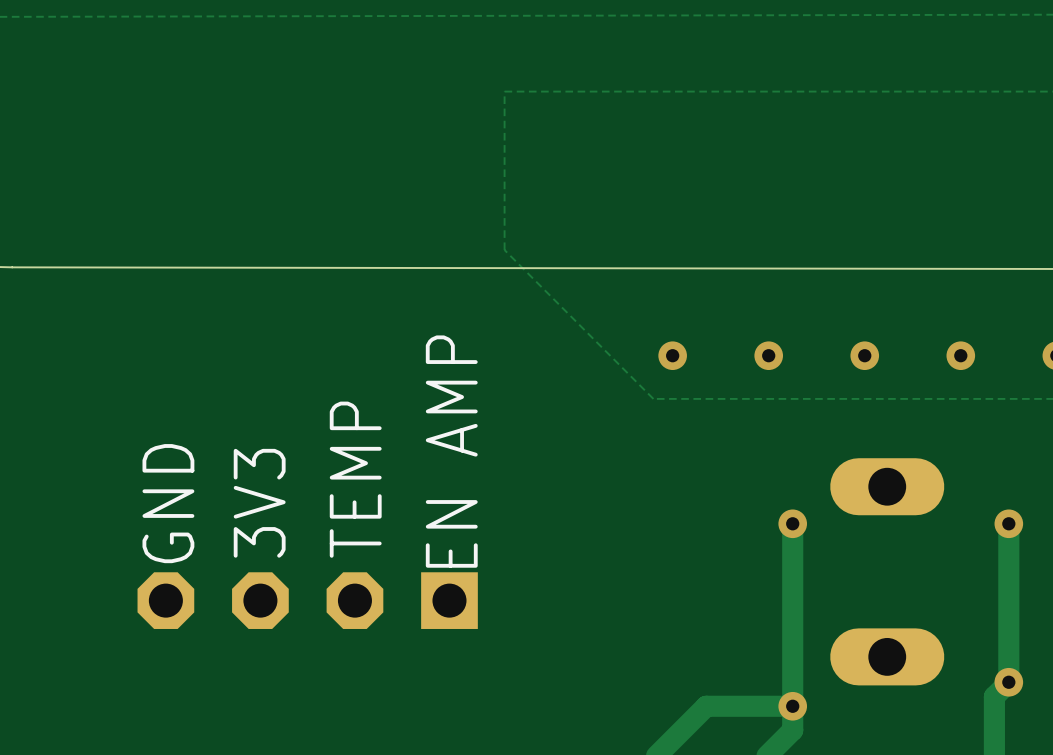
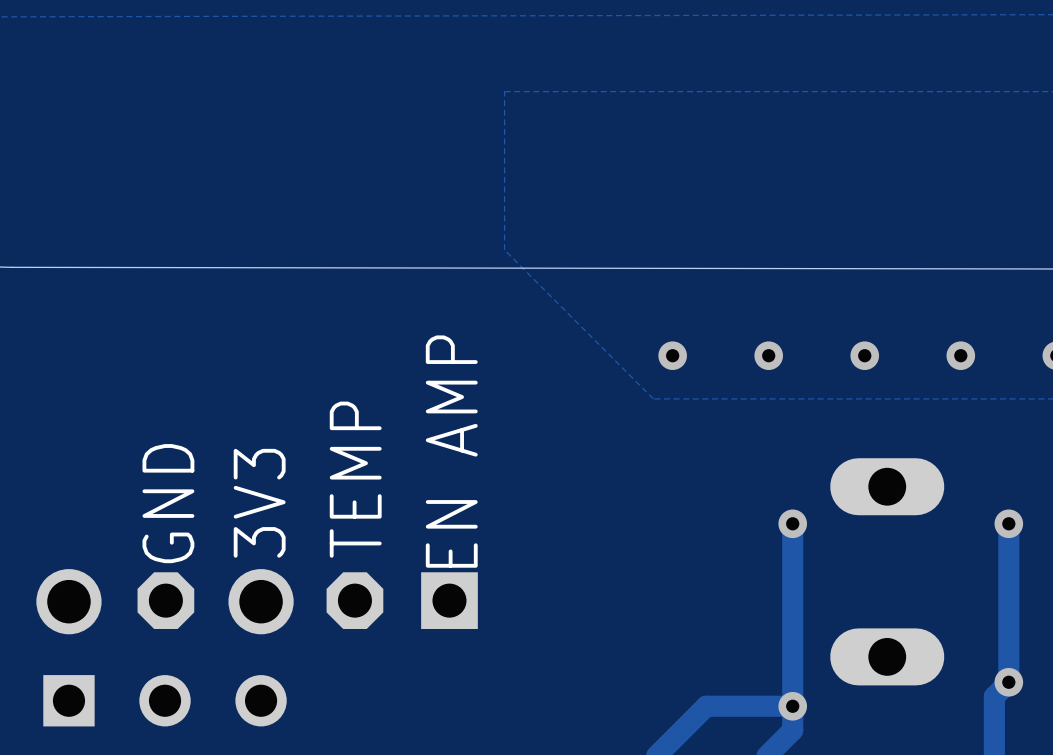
part: none -> (165, 647)

